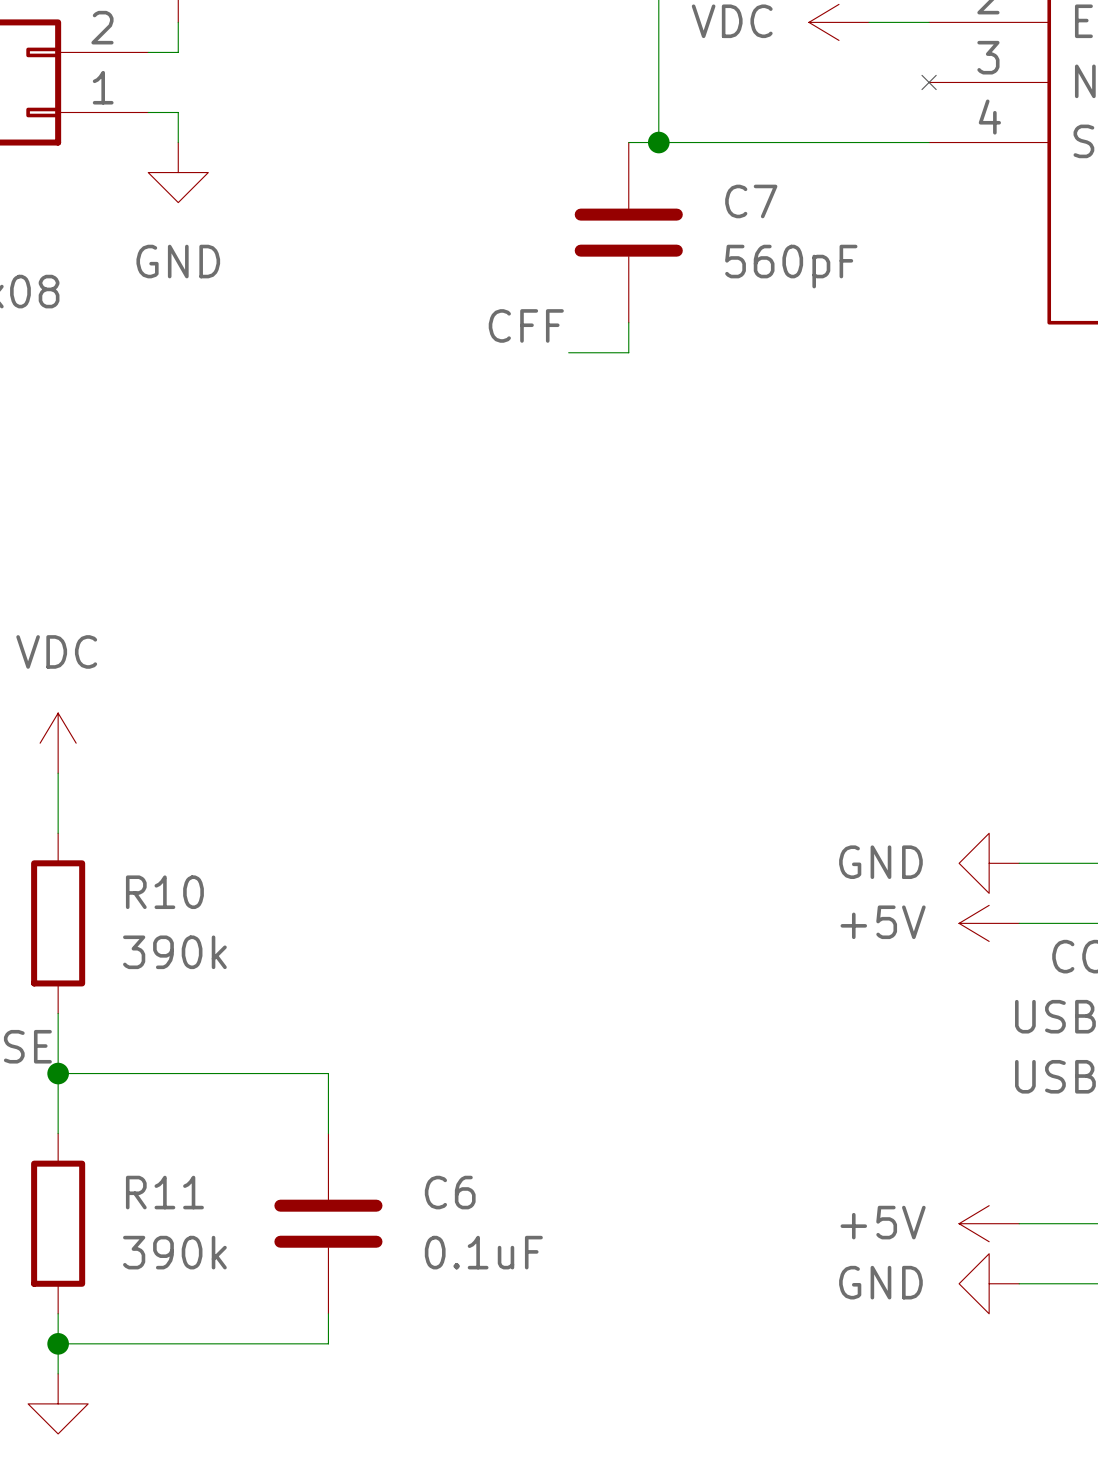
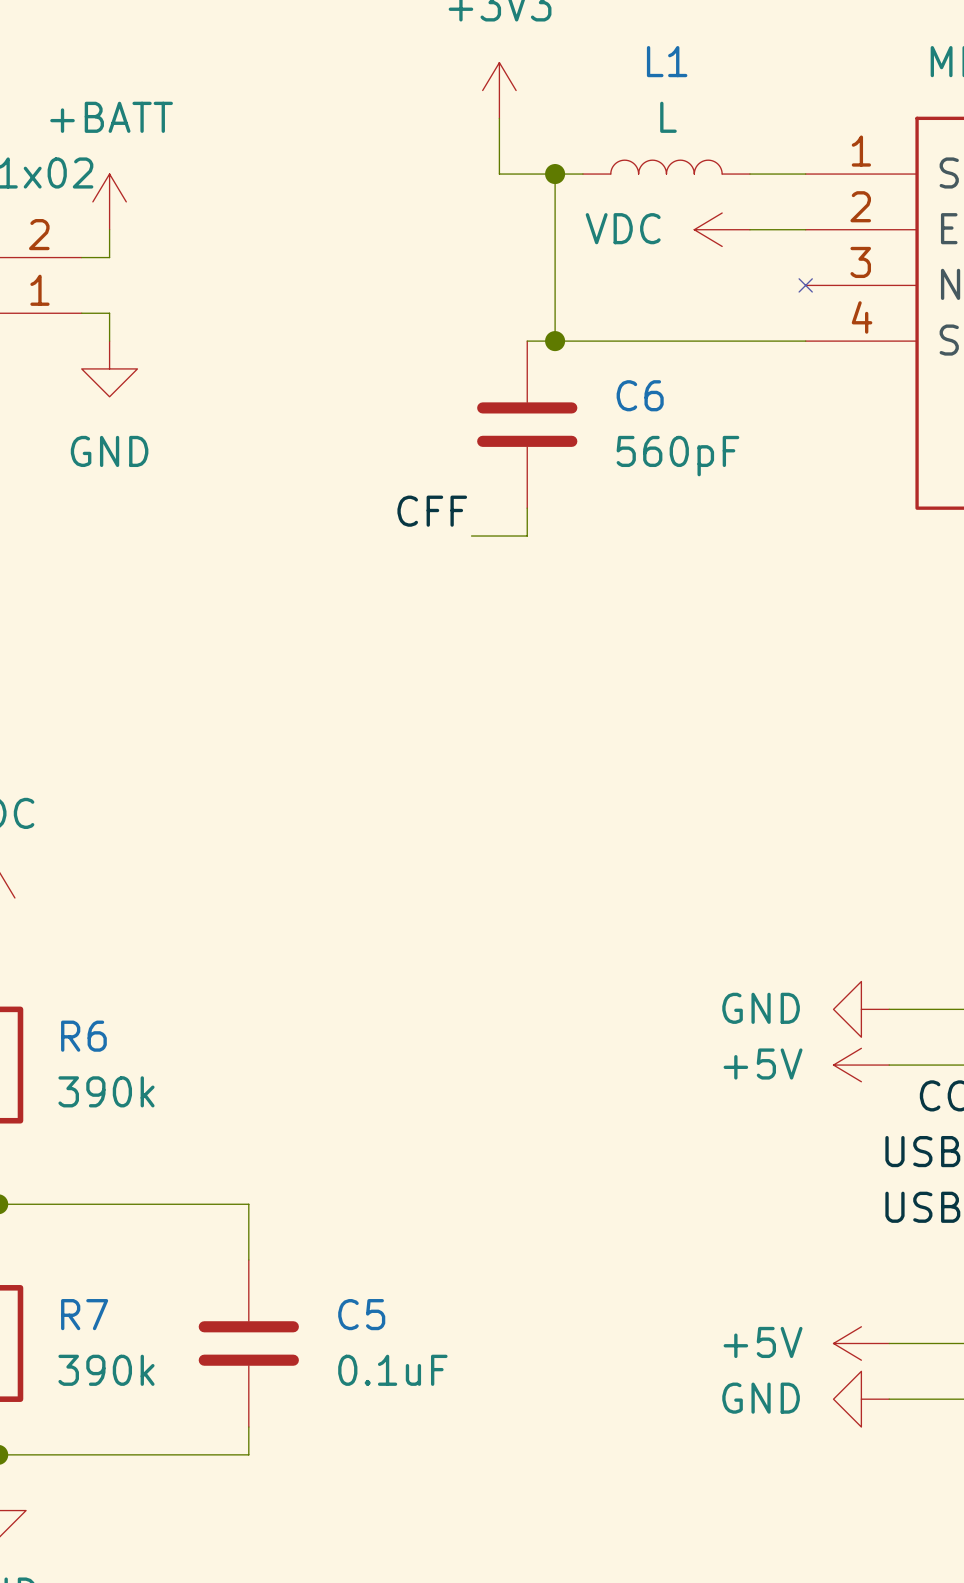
C7 name: C7 (751, 201) -> C6 (640, 395)
R10 name: R10 (164, 892) -> R6 (83, 1036)
R11 name: R11 (164, 1192) -> R7 (84, 1314)
C6 name: C6 (450, 1192) -> C5 (361, 1314)

